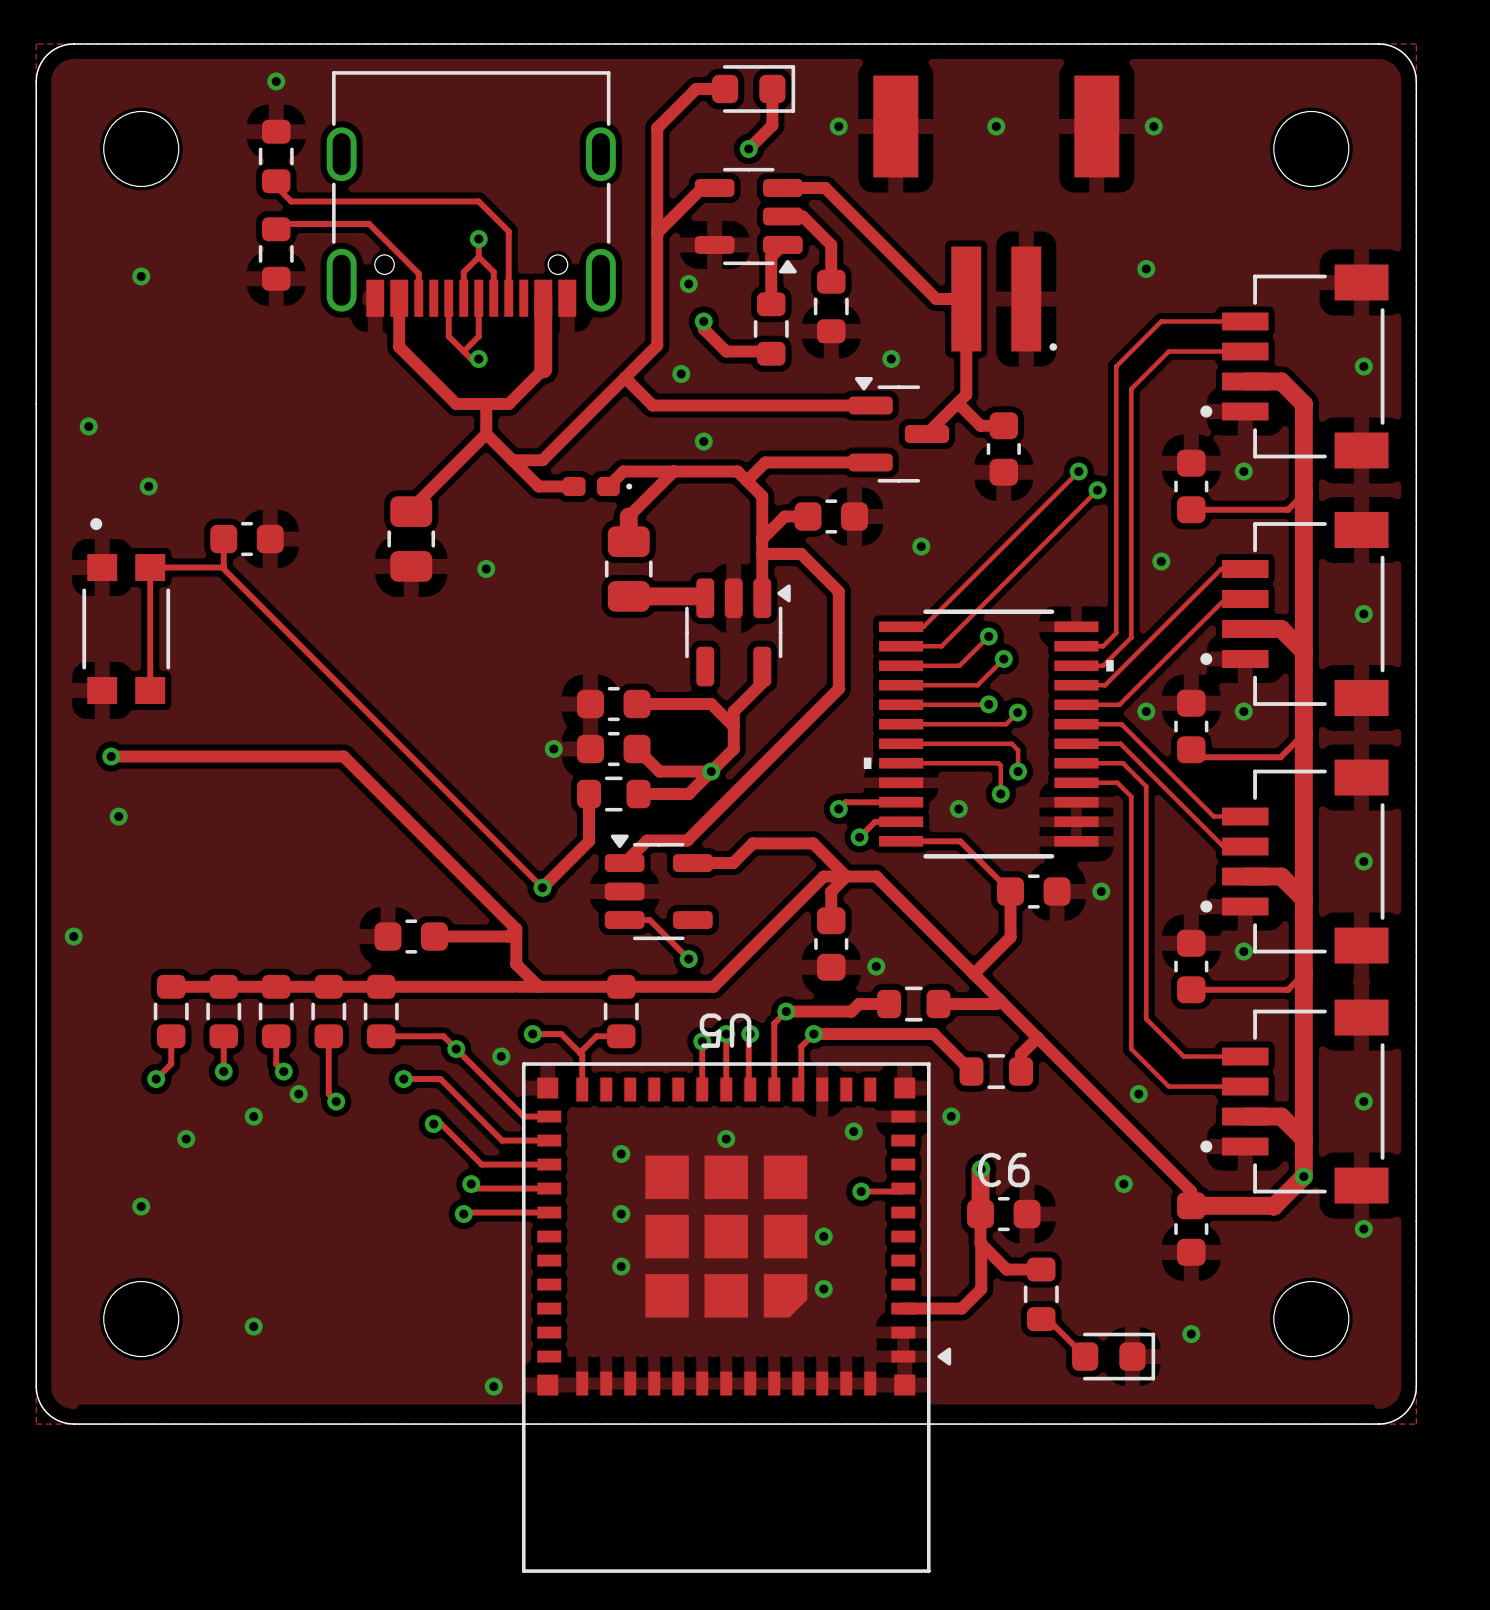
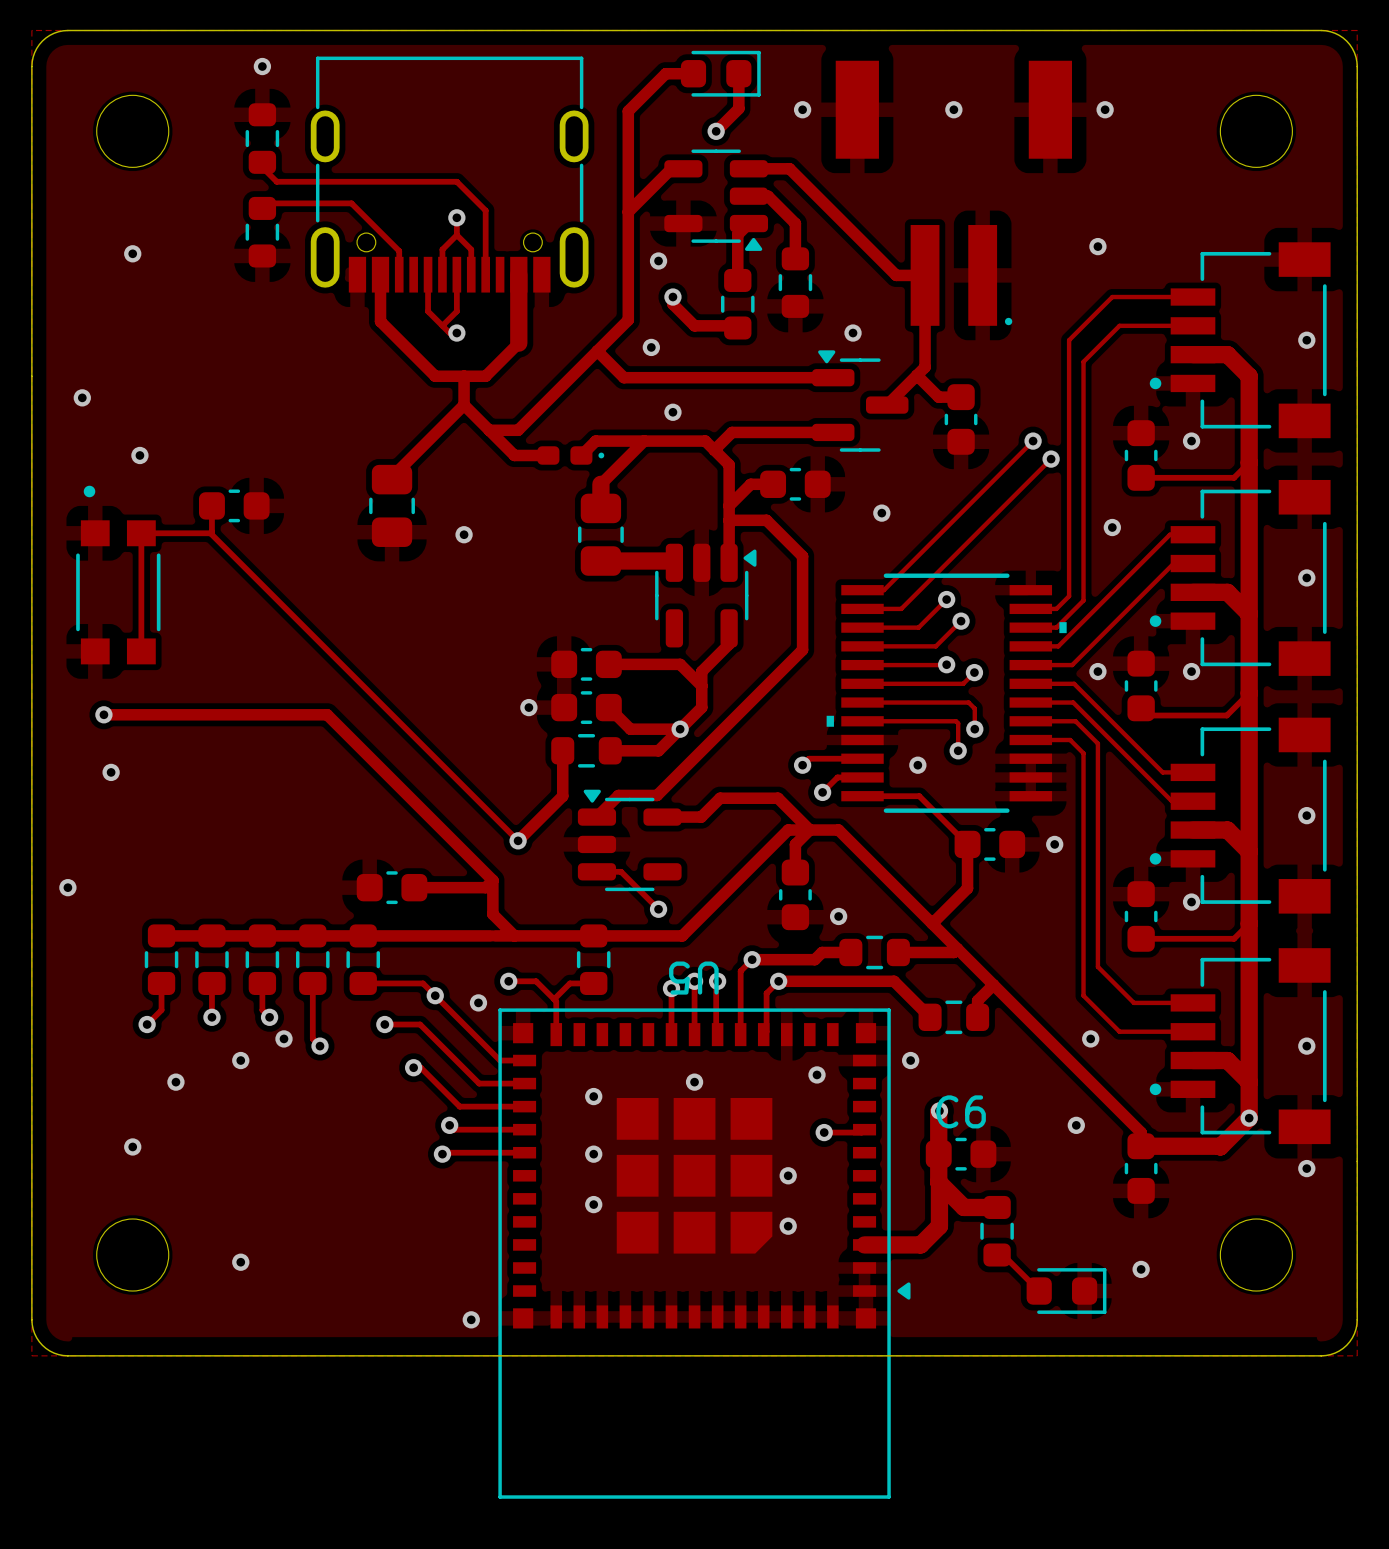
track width: thin (980, 1214) (980, 1243) (1006, 1269) (1041, 1269) -> thick (938, 1154) (938, 1182) (963, 1207) (997, 1207)
track width: thin (981, 1244) (981, 1289) (961, 1308) (903, 1308) -> thick (939, 1182) (939, 1226) (920, 1244) (864, 1244)

